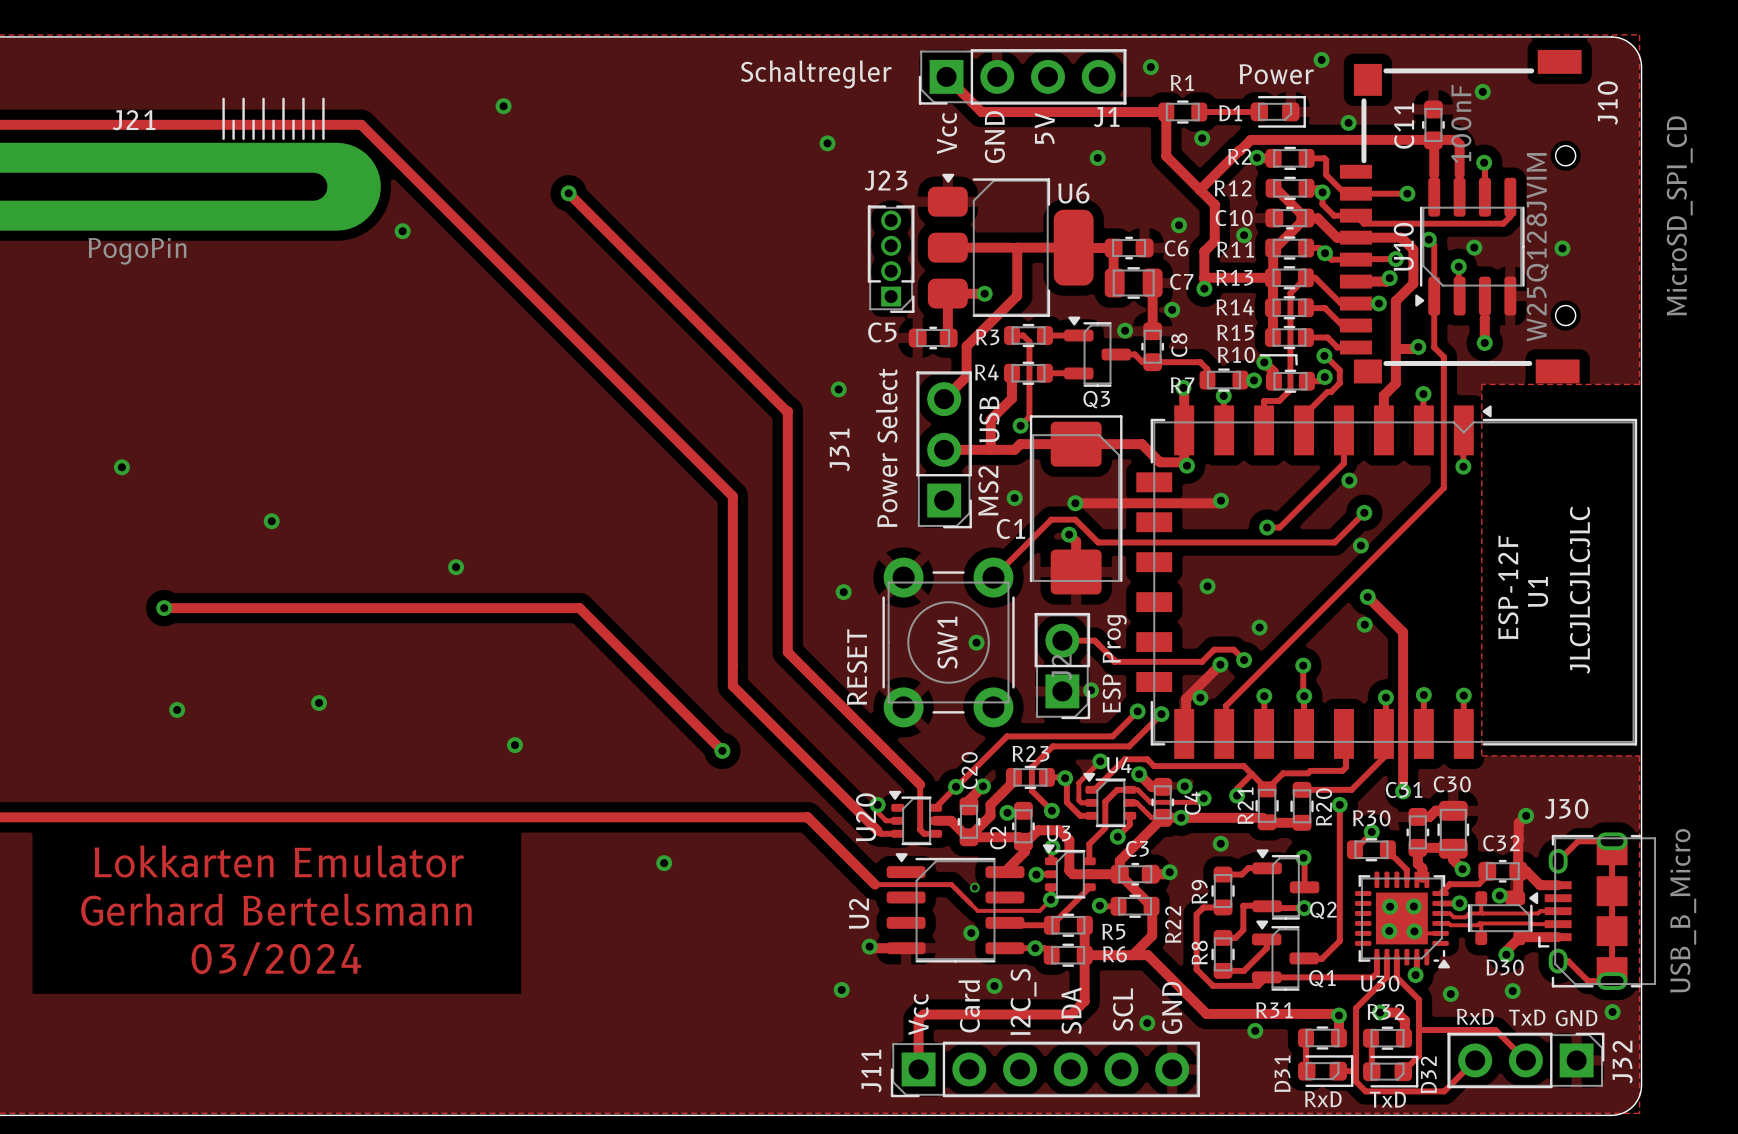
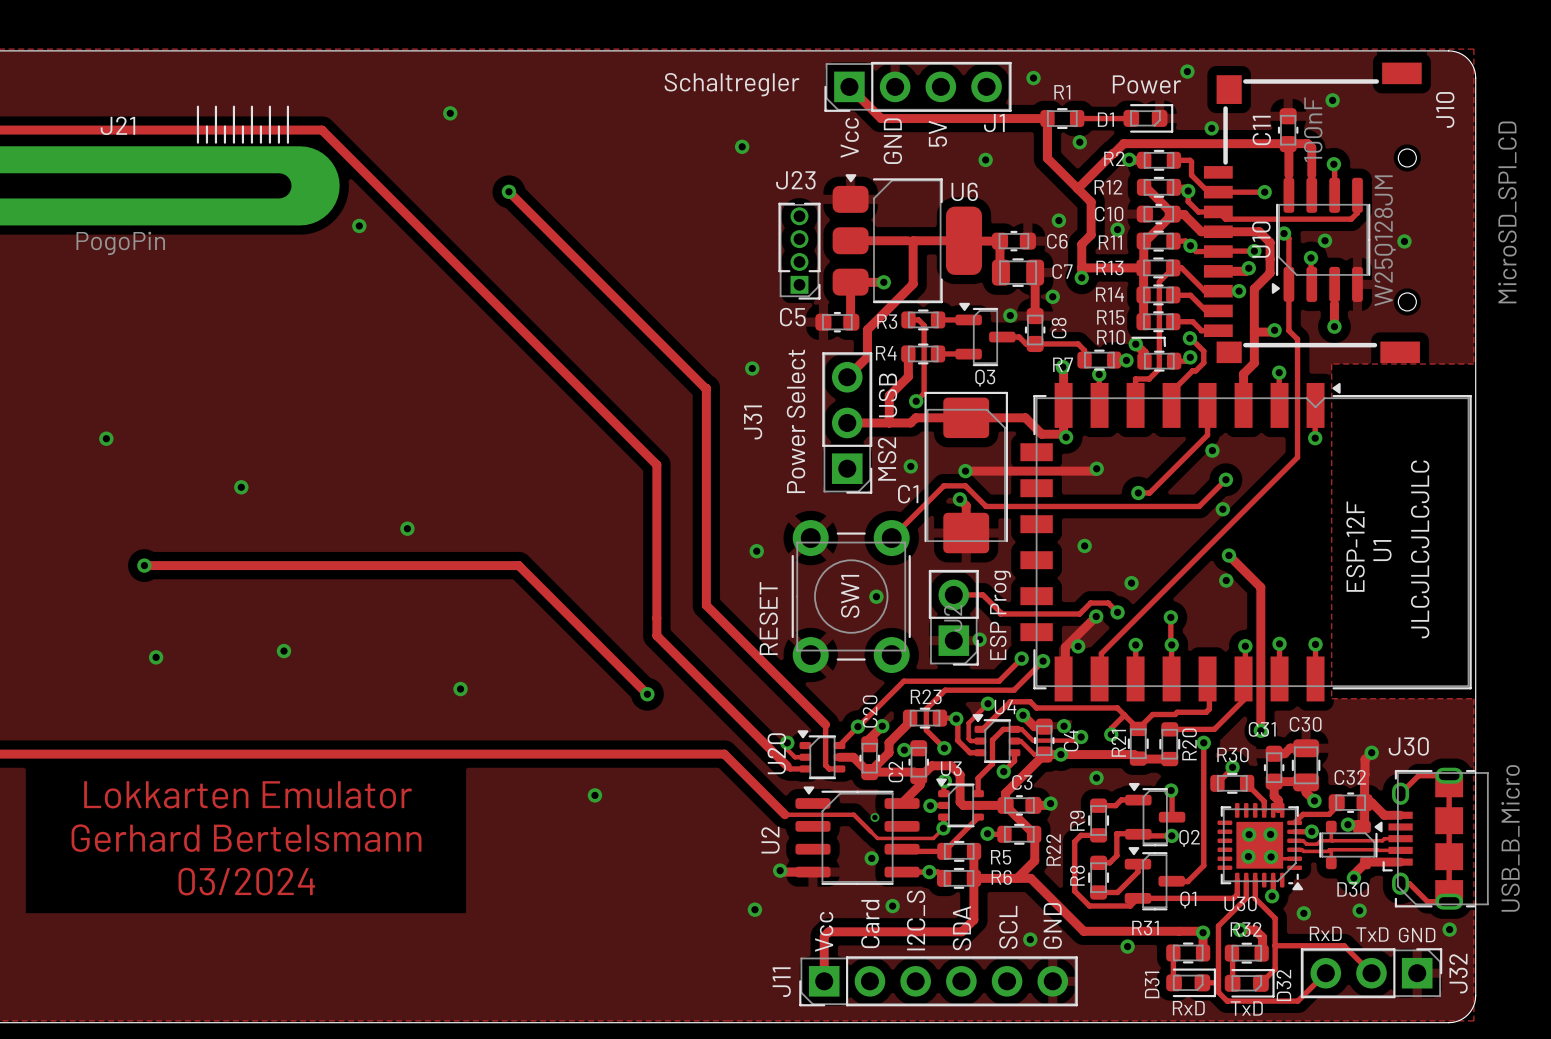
U10 value: W25Q128JVIM (1537, 247) -> W25Q128JM (1385, 240)

